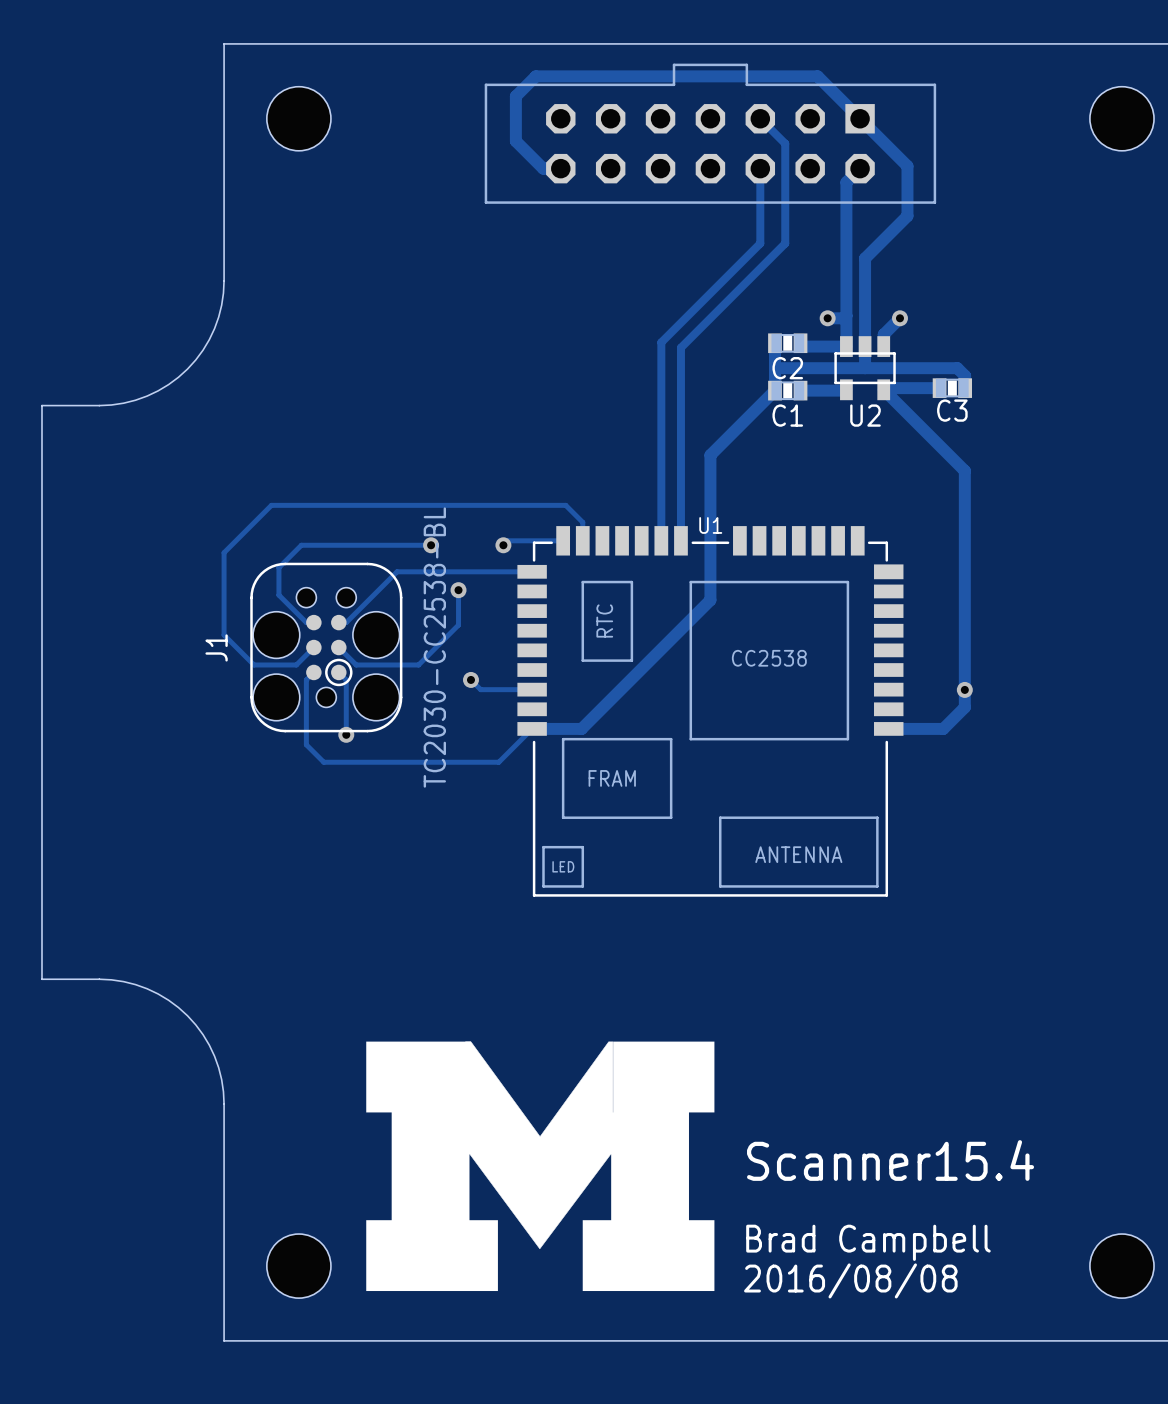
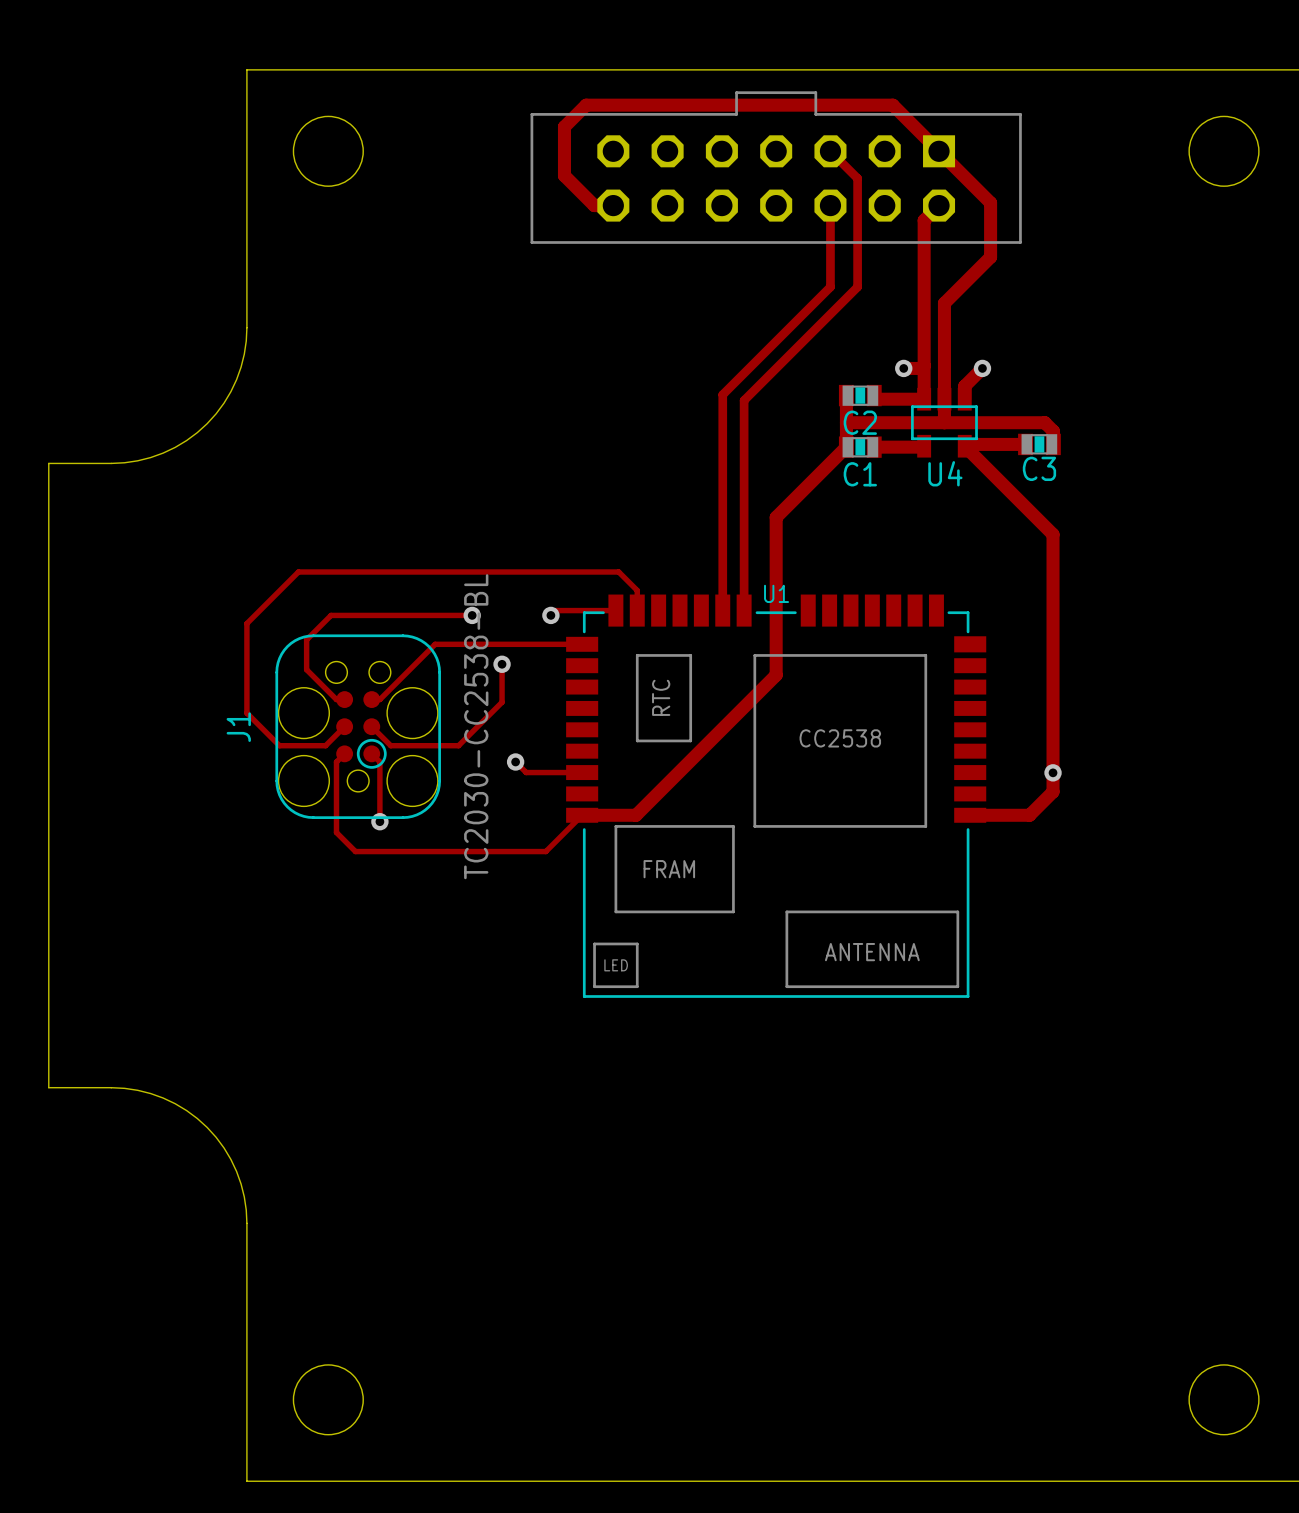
U2 name: U2 (865, 415) -> U4 (945, 473)
drawing: [366, 1041, 715, 1292] -> none
text: Scanner15.4 (890, 1160) -> none
text: Brad Campbell (868, 1242) -> none
text: 2016/08/08 (850, 1280) -> none

